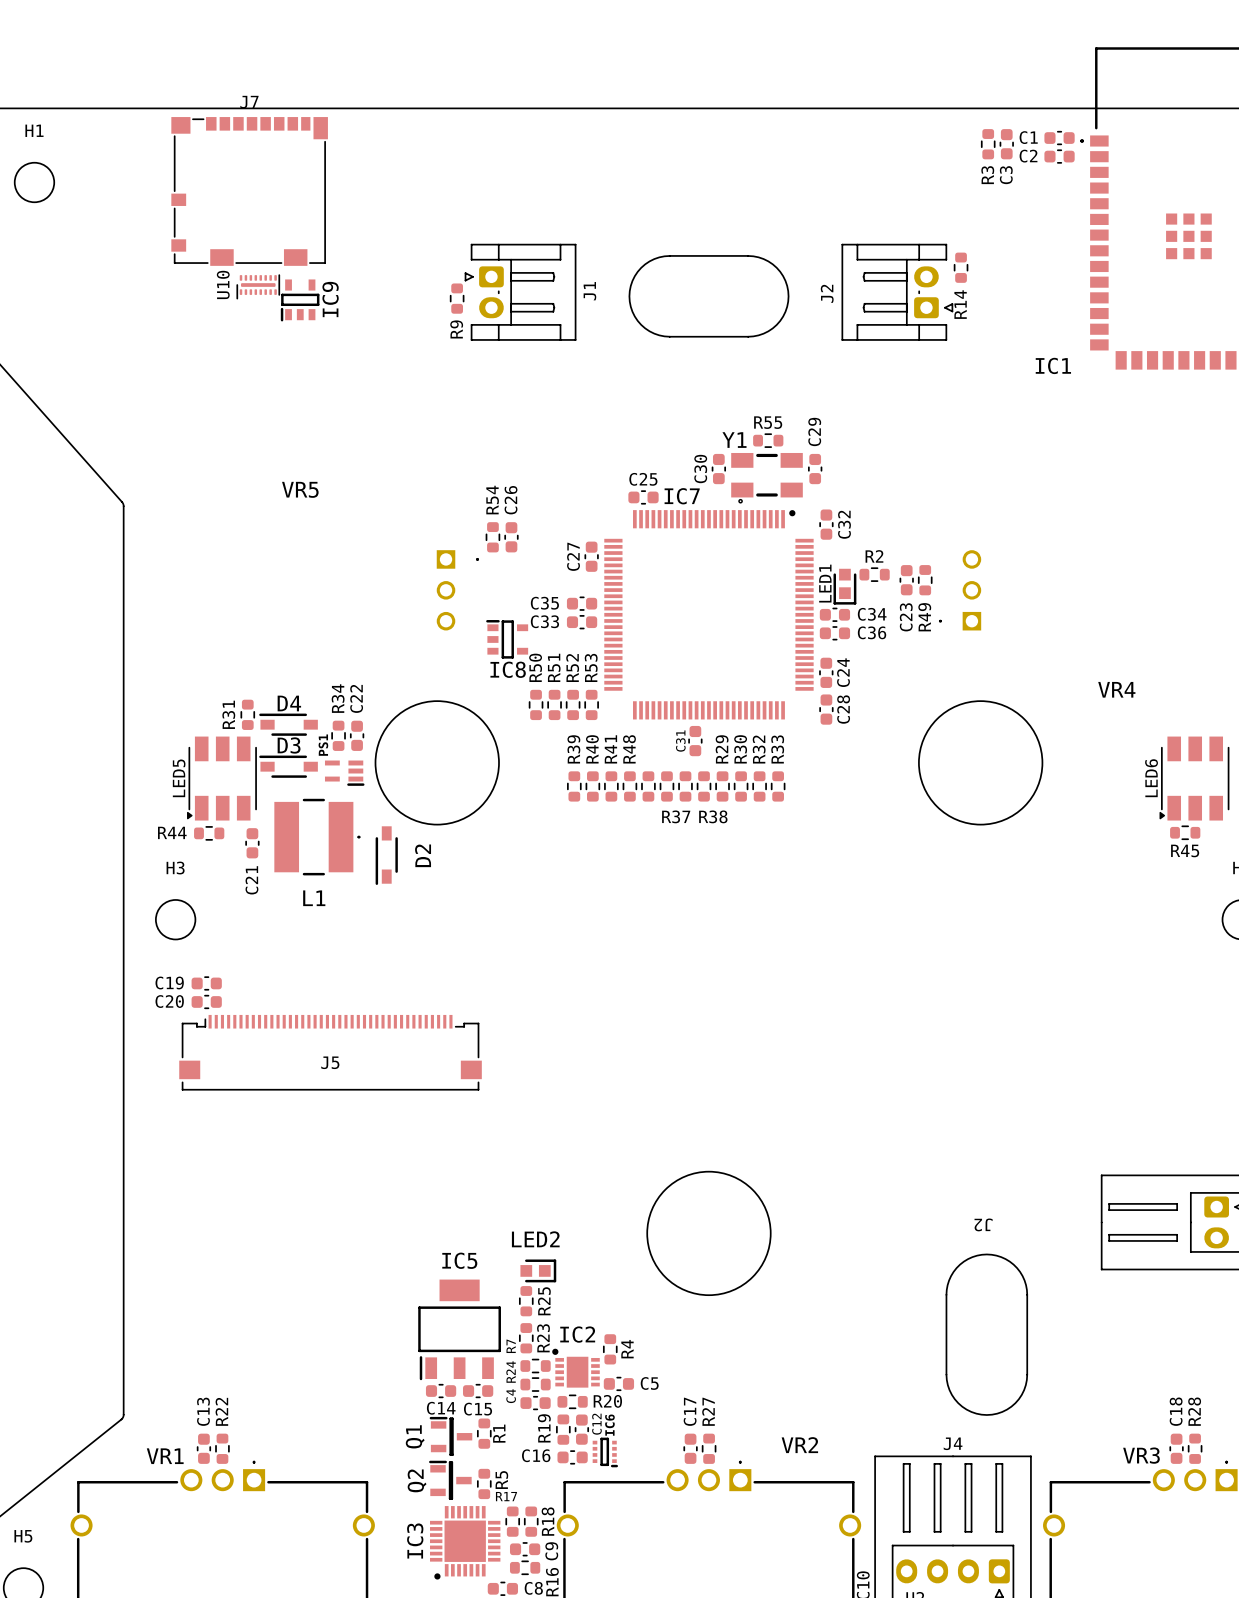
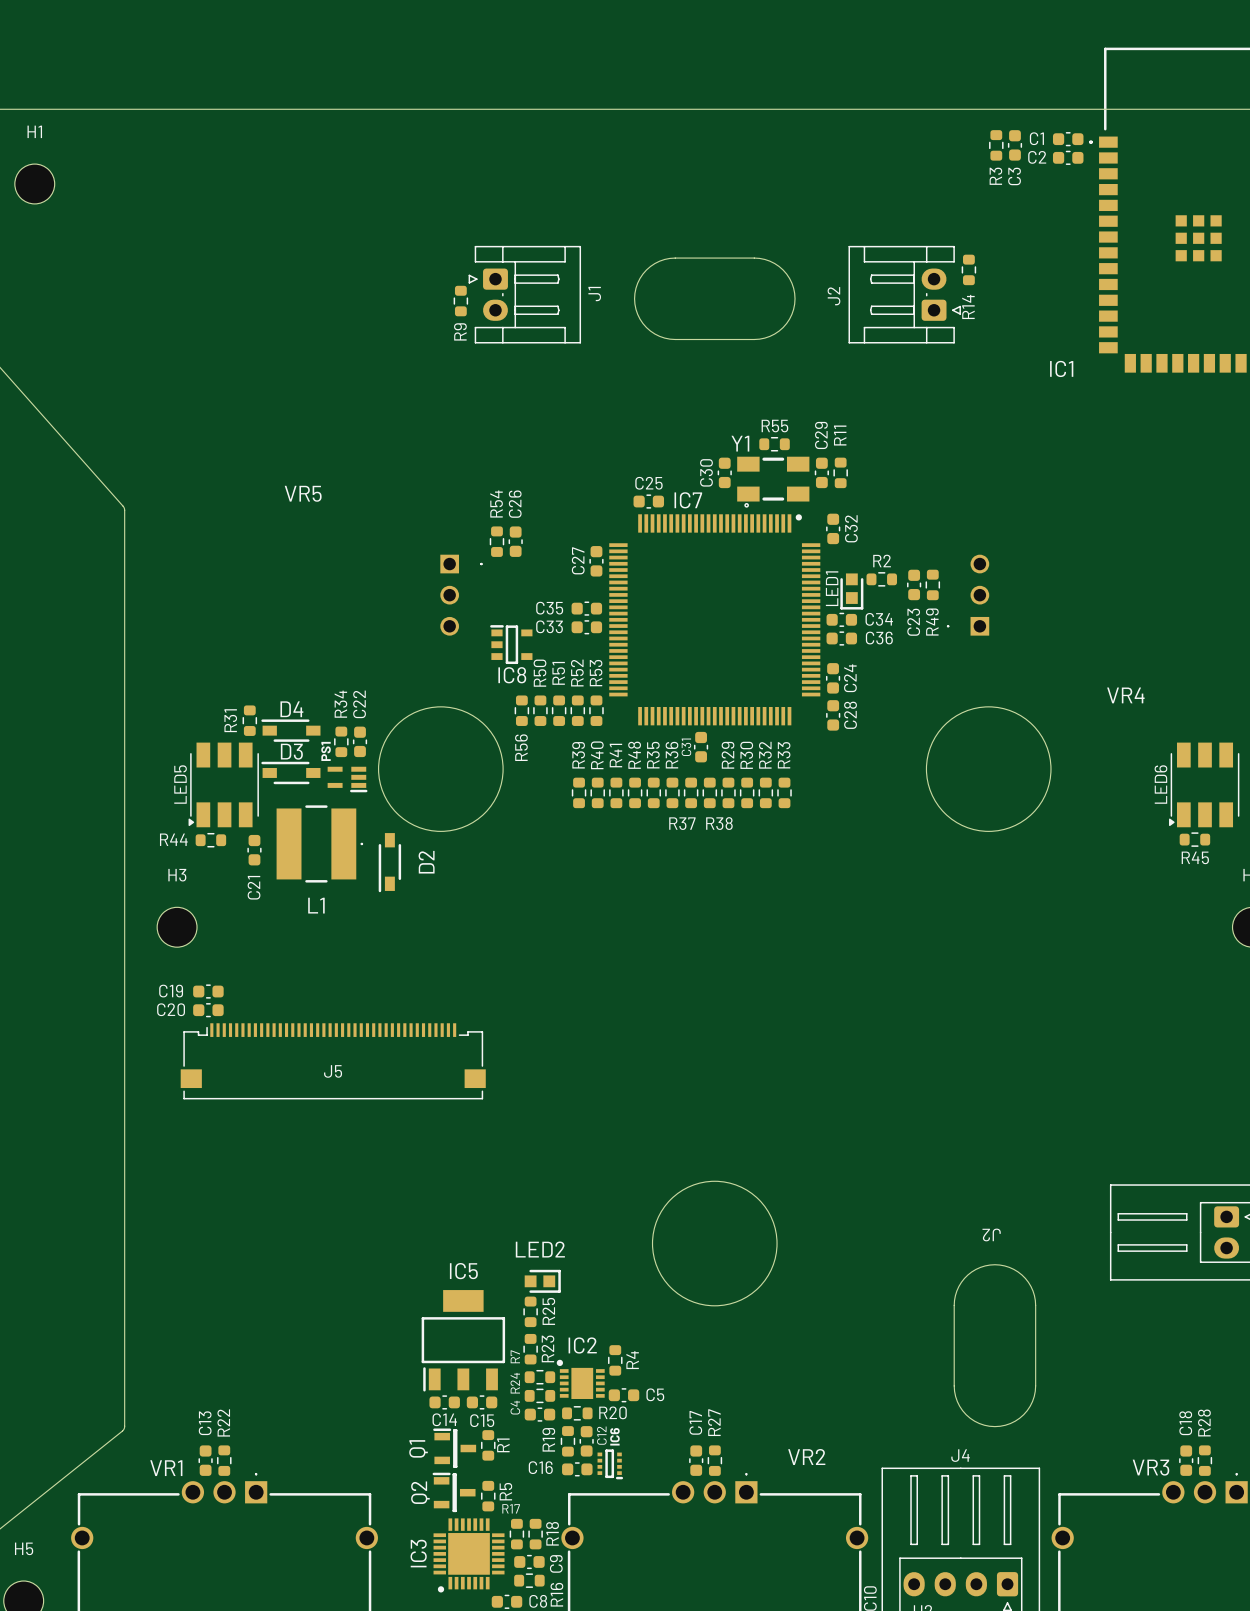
J7: (249, 191) -> none
U10: (258, 286) -> none
IC9: (300, 300) -> none
R11: none -> (840, 472)
R56: none -> (521, 710)
R35 name: none -> R35 (653, 755)
R36 name: none -> R36 (671, 755)

